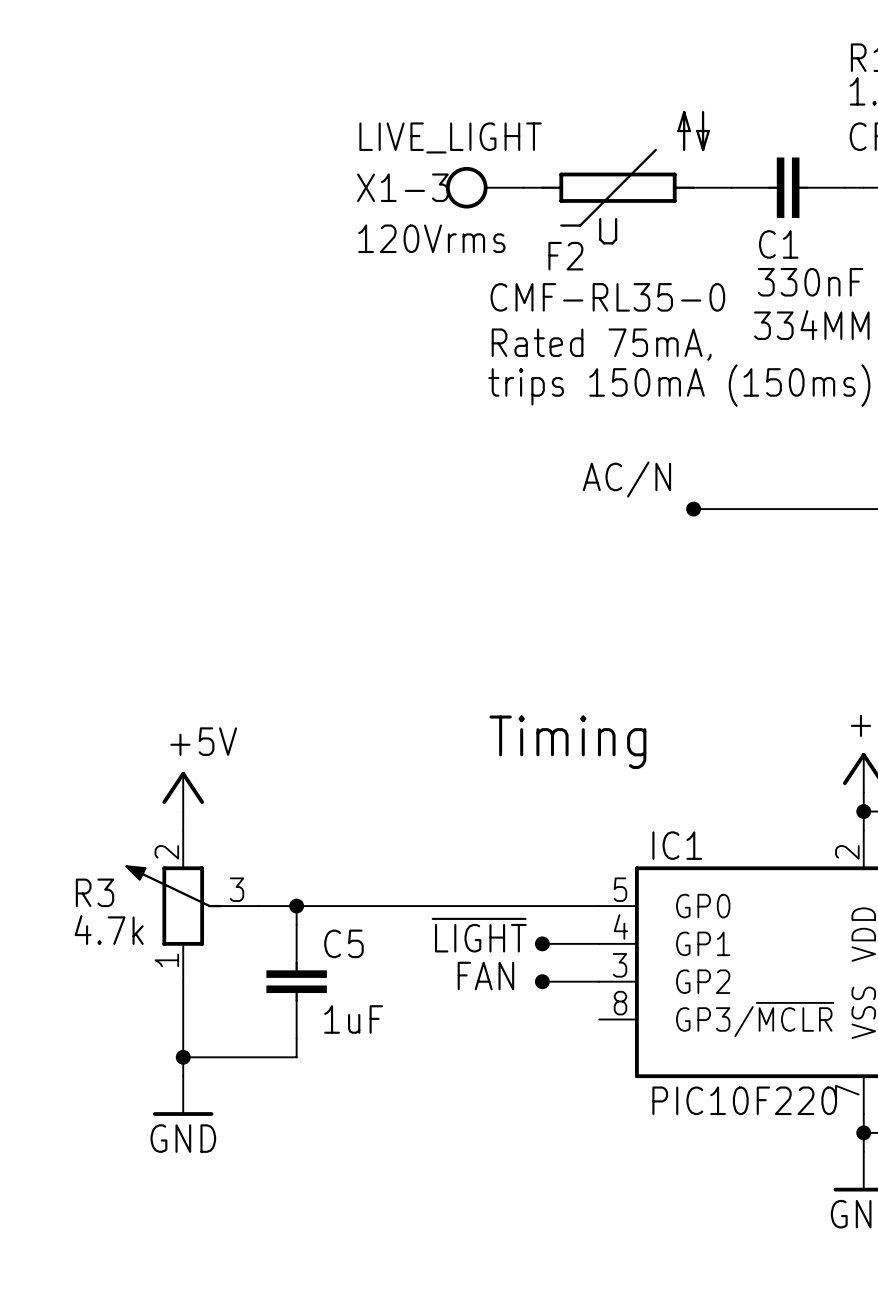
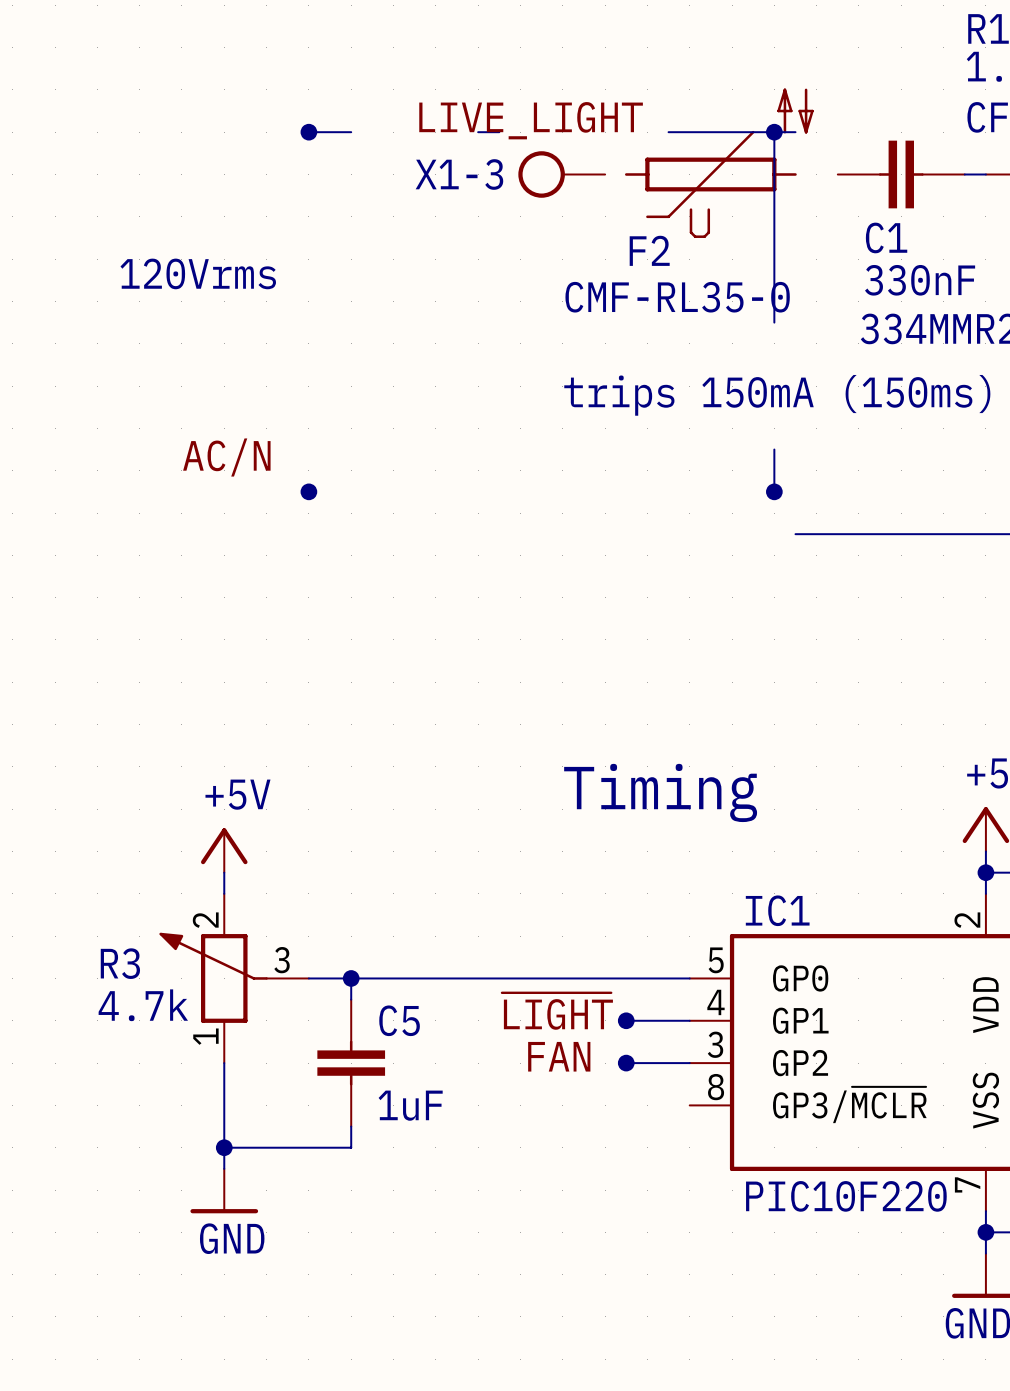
wire: none -> (308, 132) (351, 132)
junction: none -> (308, 132)
wire: none -> (668, 132) (795, 132)
wire: none -> (774, 132) (774, 322)
junction: none -> (774, 132)
wire: (523, 187) (542, 187) -> (478, 132) (499, 132)
wire: (693, 187) (731, 187) -> none
text position: 120Vrms (431, 238) -> 120Vrms (198, 273)
text: Rated 75mA, (601, 344) -> none
wire: none -> (774, 449) (774, 491)
label: none -> AC/N (226, 457)
junction: none -> (308, 491)
label: AC/N (626, 479) -> none
junction position: (693, 509) -> (774, 491)

